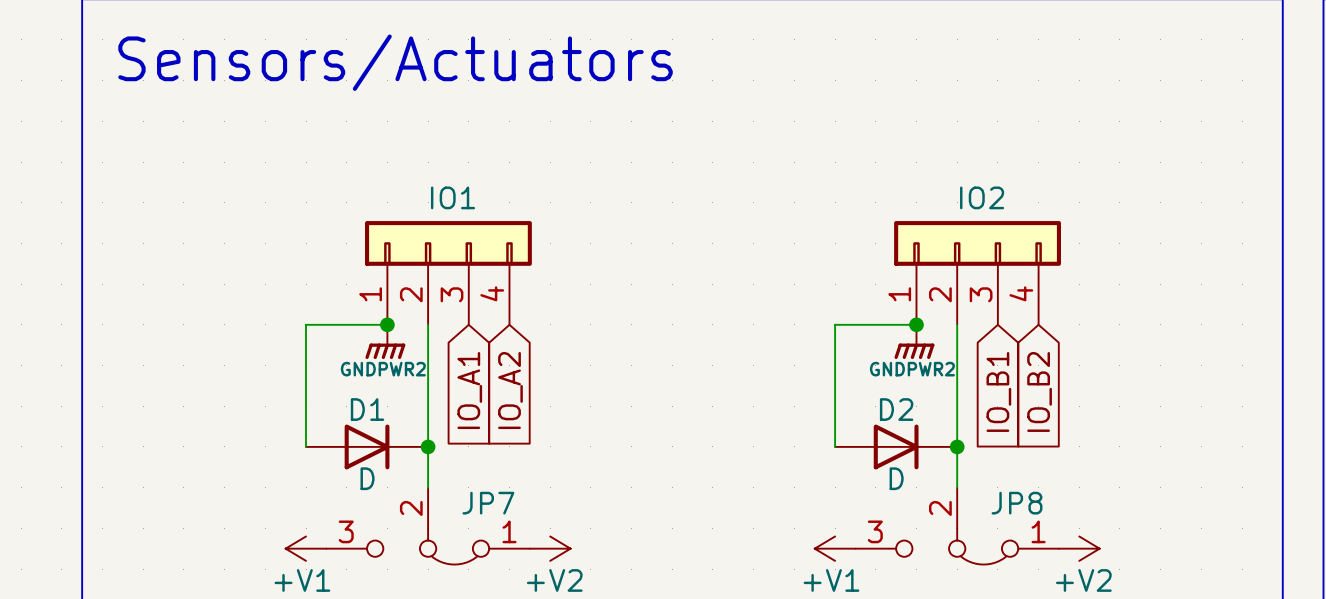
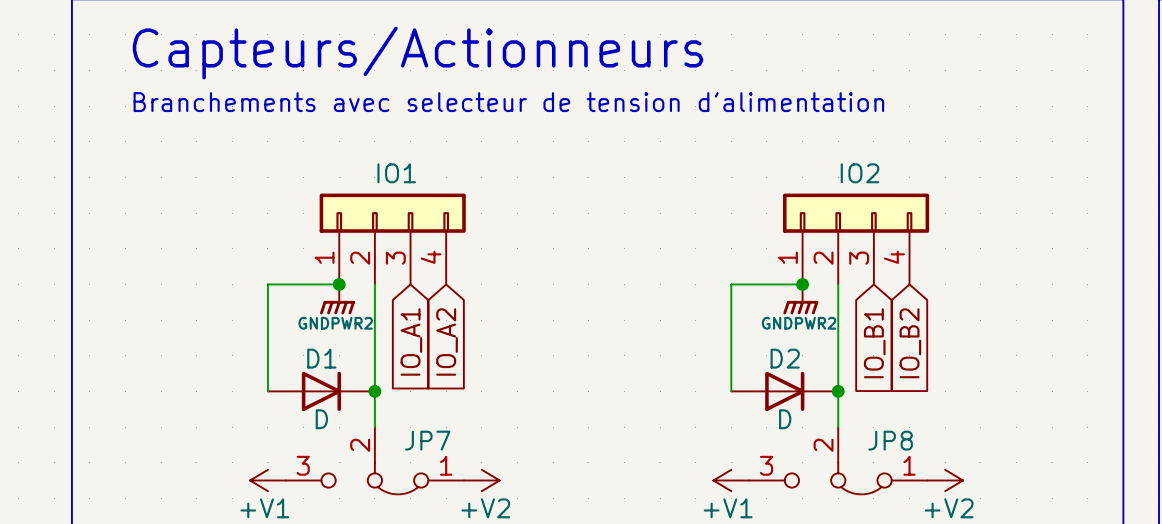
text: none -> Capteurs/Actionneurs (417, 53)
text: Sensors/Actuators (395, 62) -> none
text: none -> Branchements avec selecteur de tension d'alimentation (508, 102)

